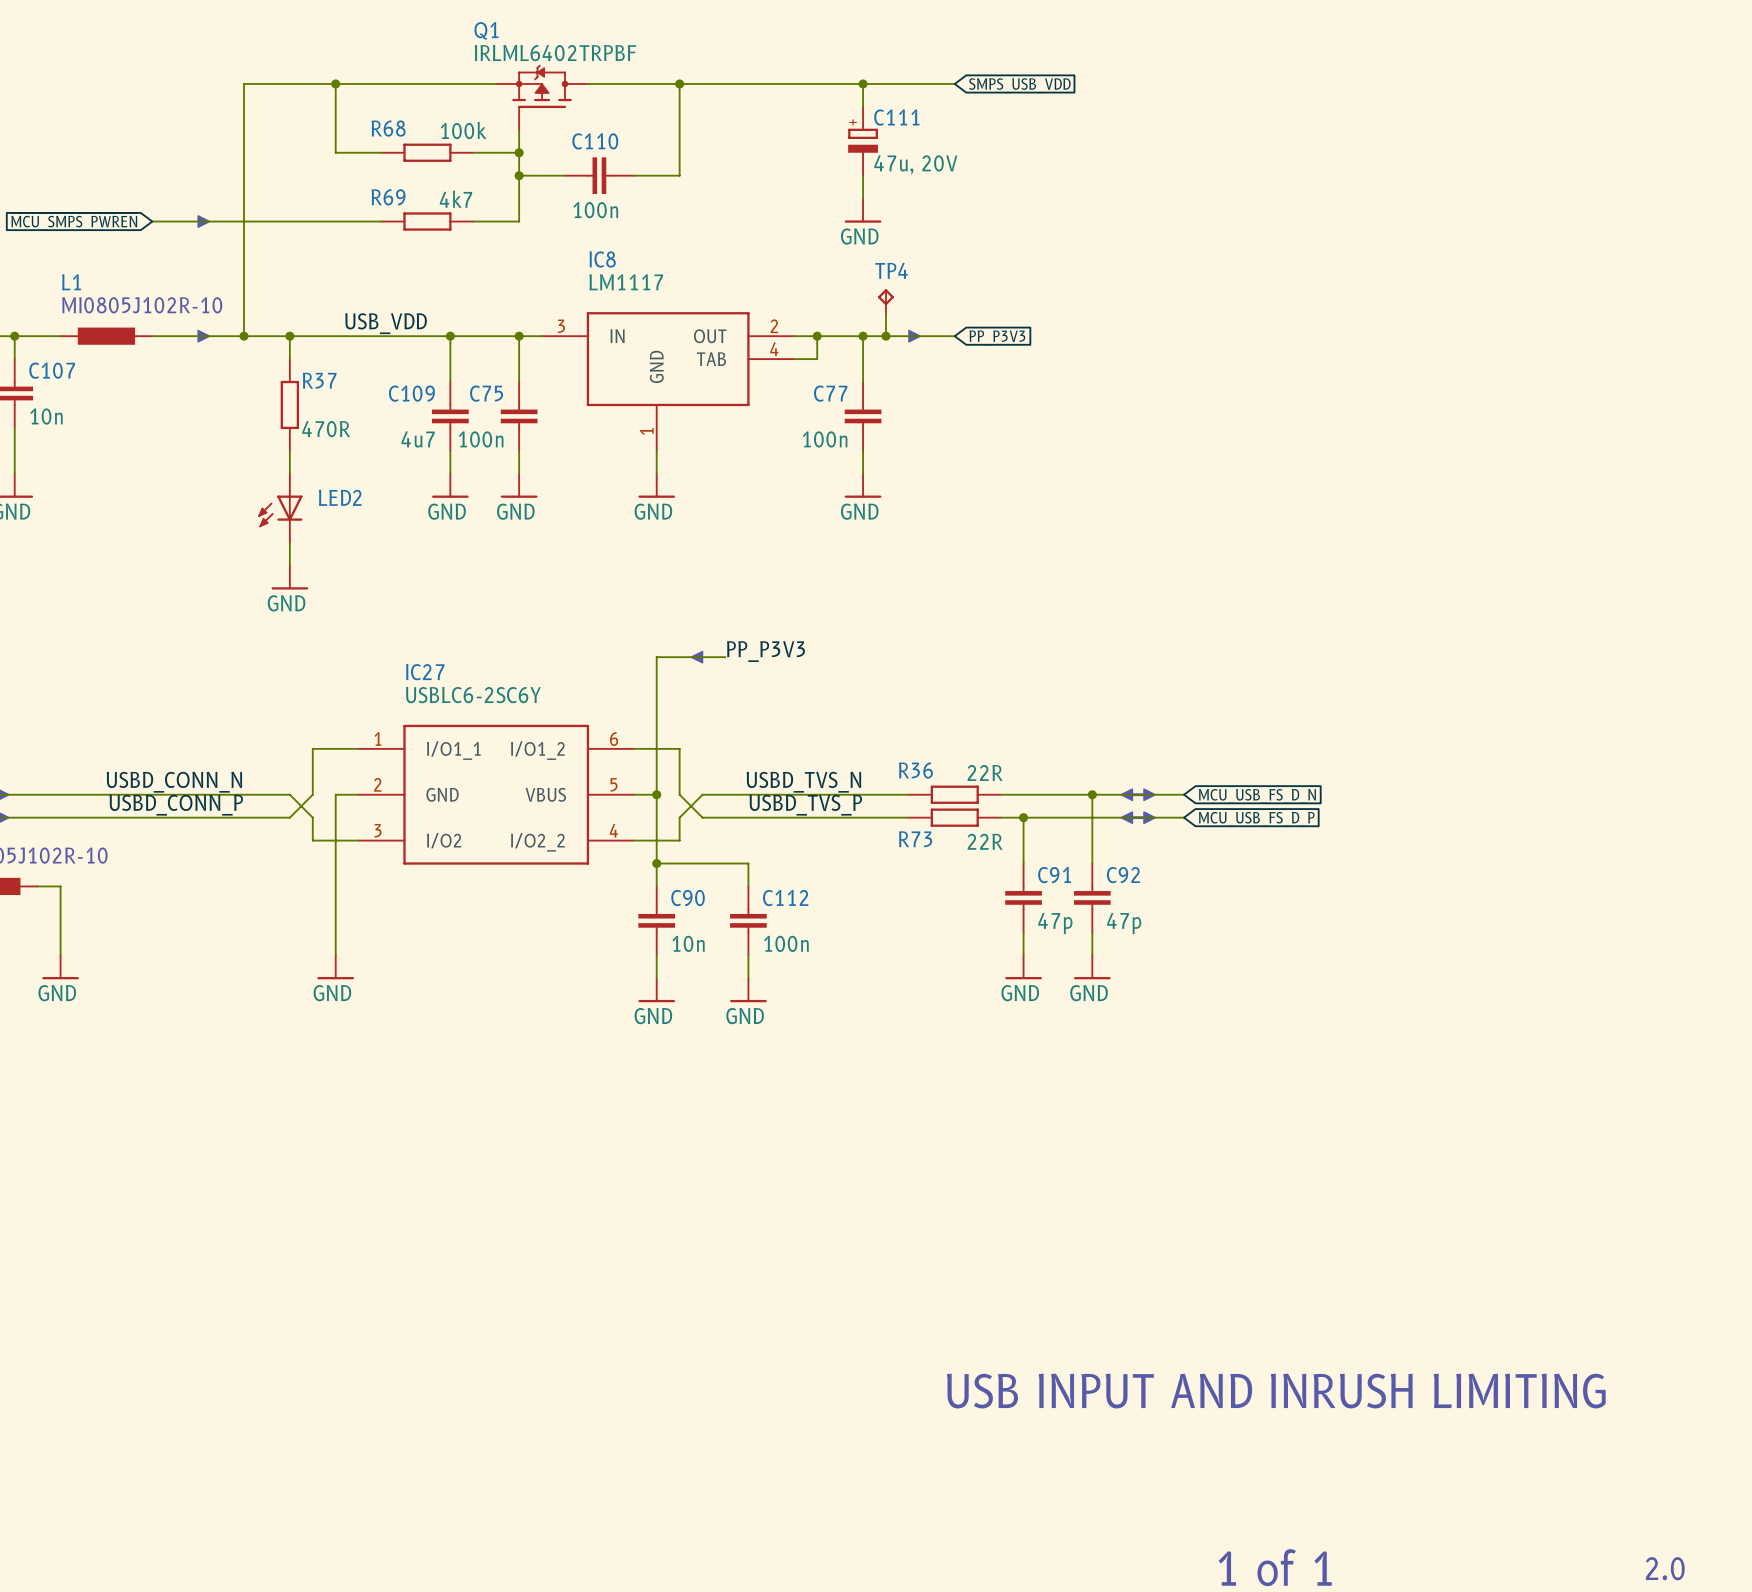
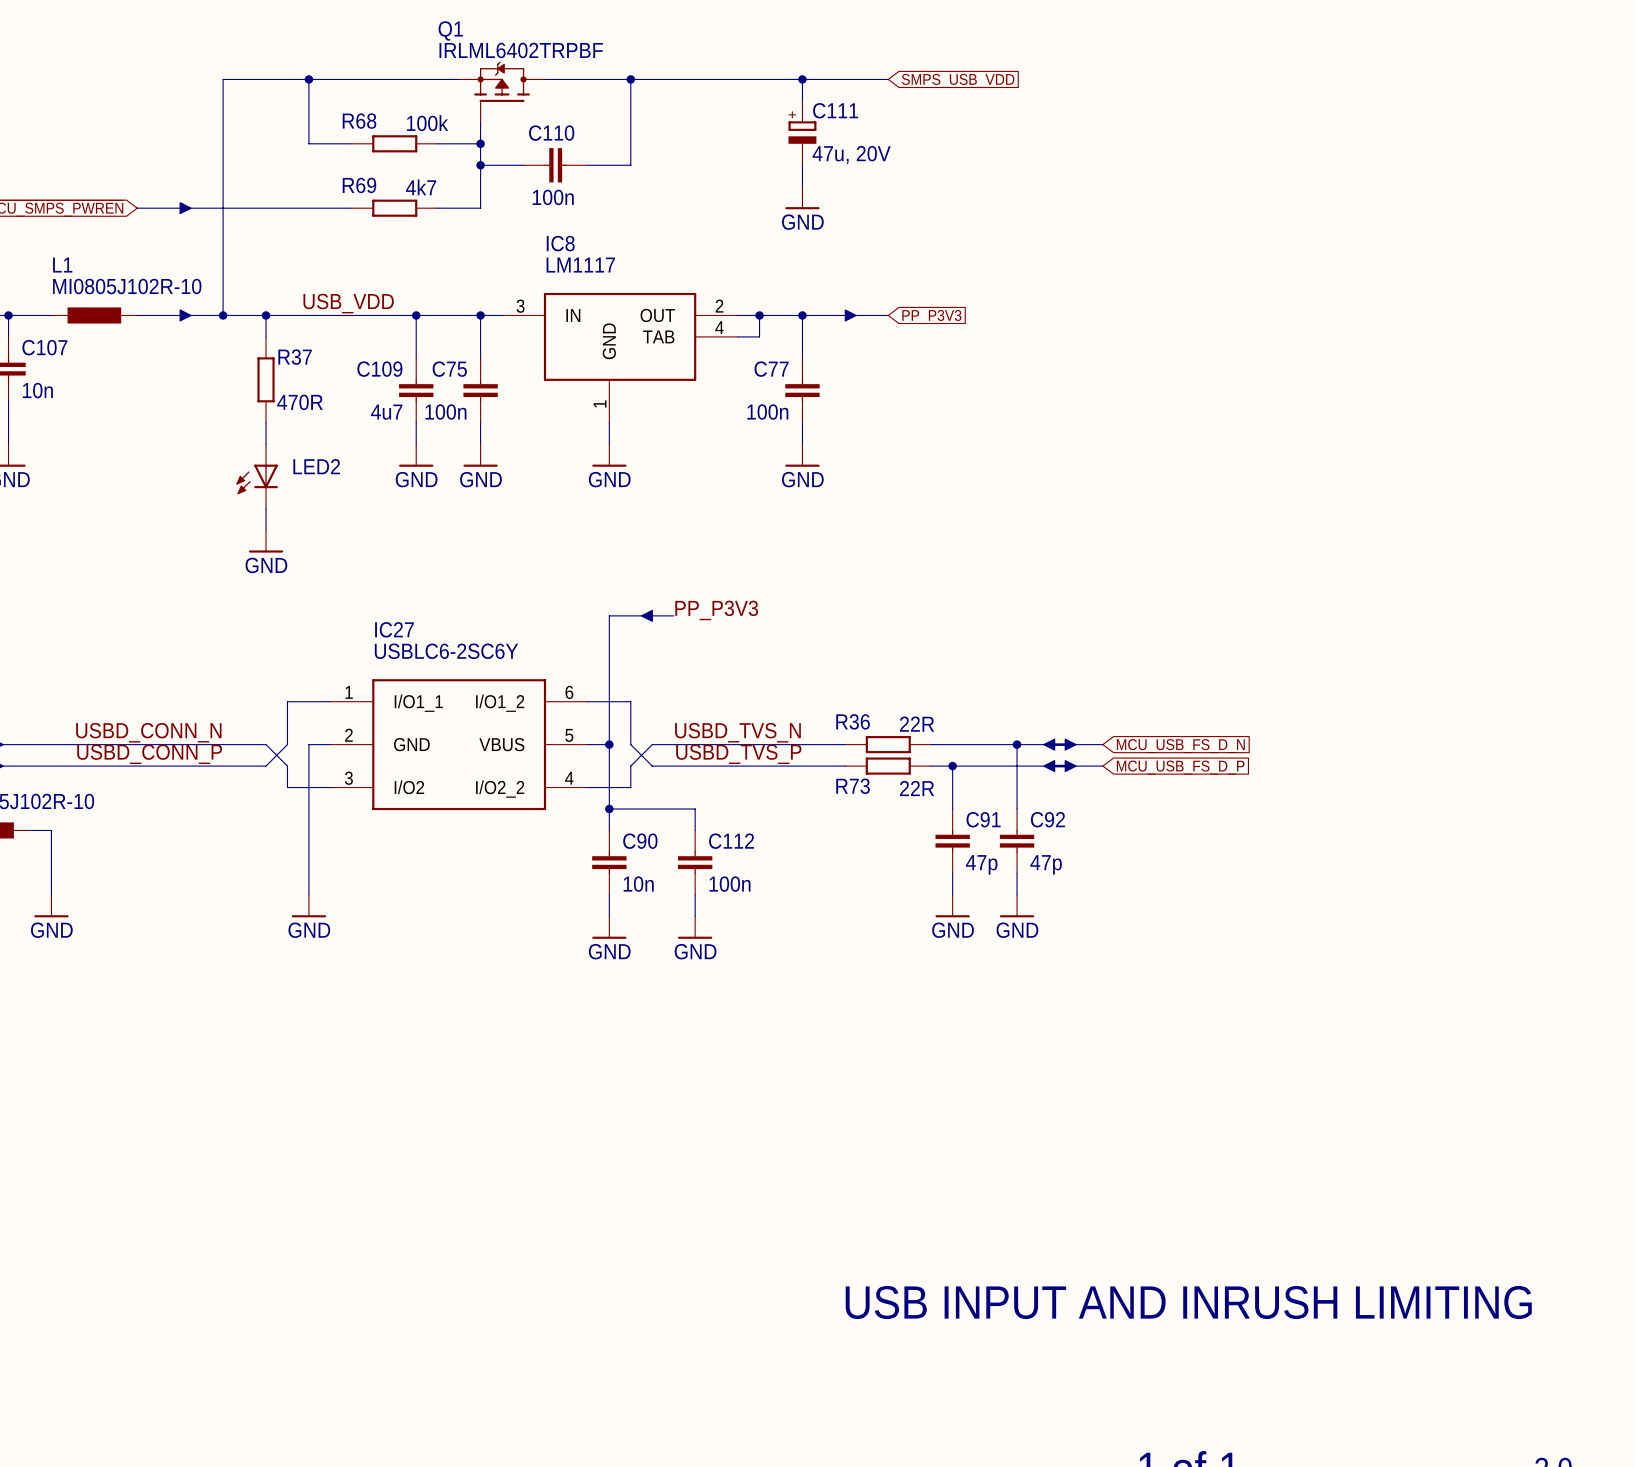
TP4: (885, 301) -> none
wire: (885, 313) (885, 336) -> none
junction: (885, 336) -> none

